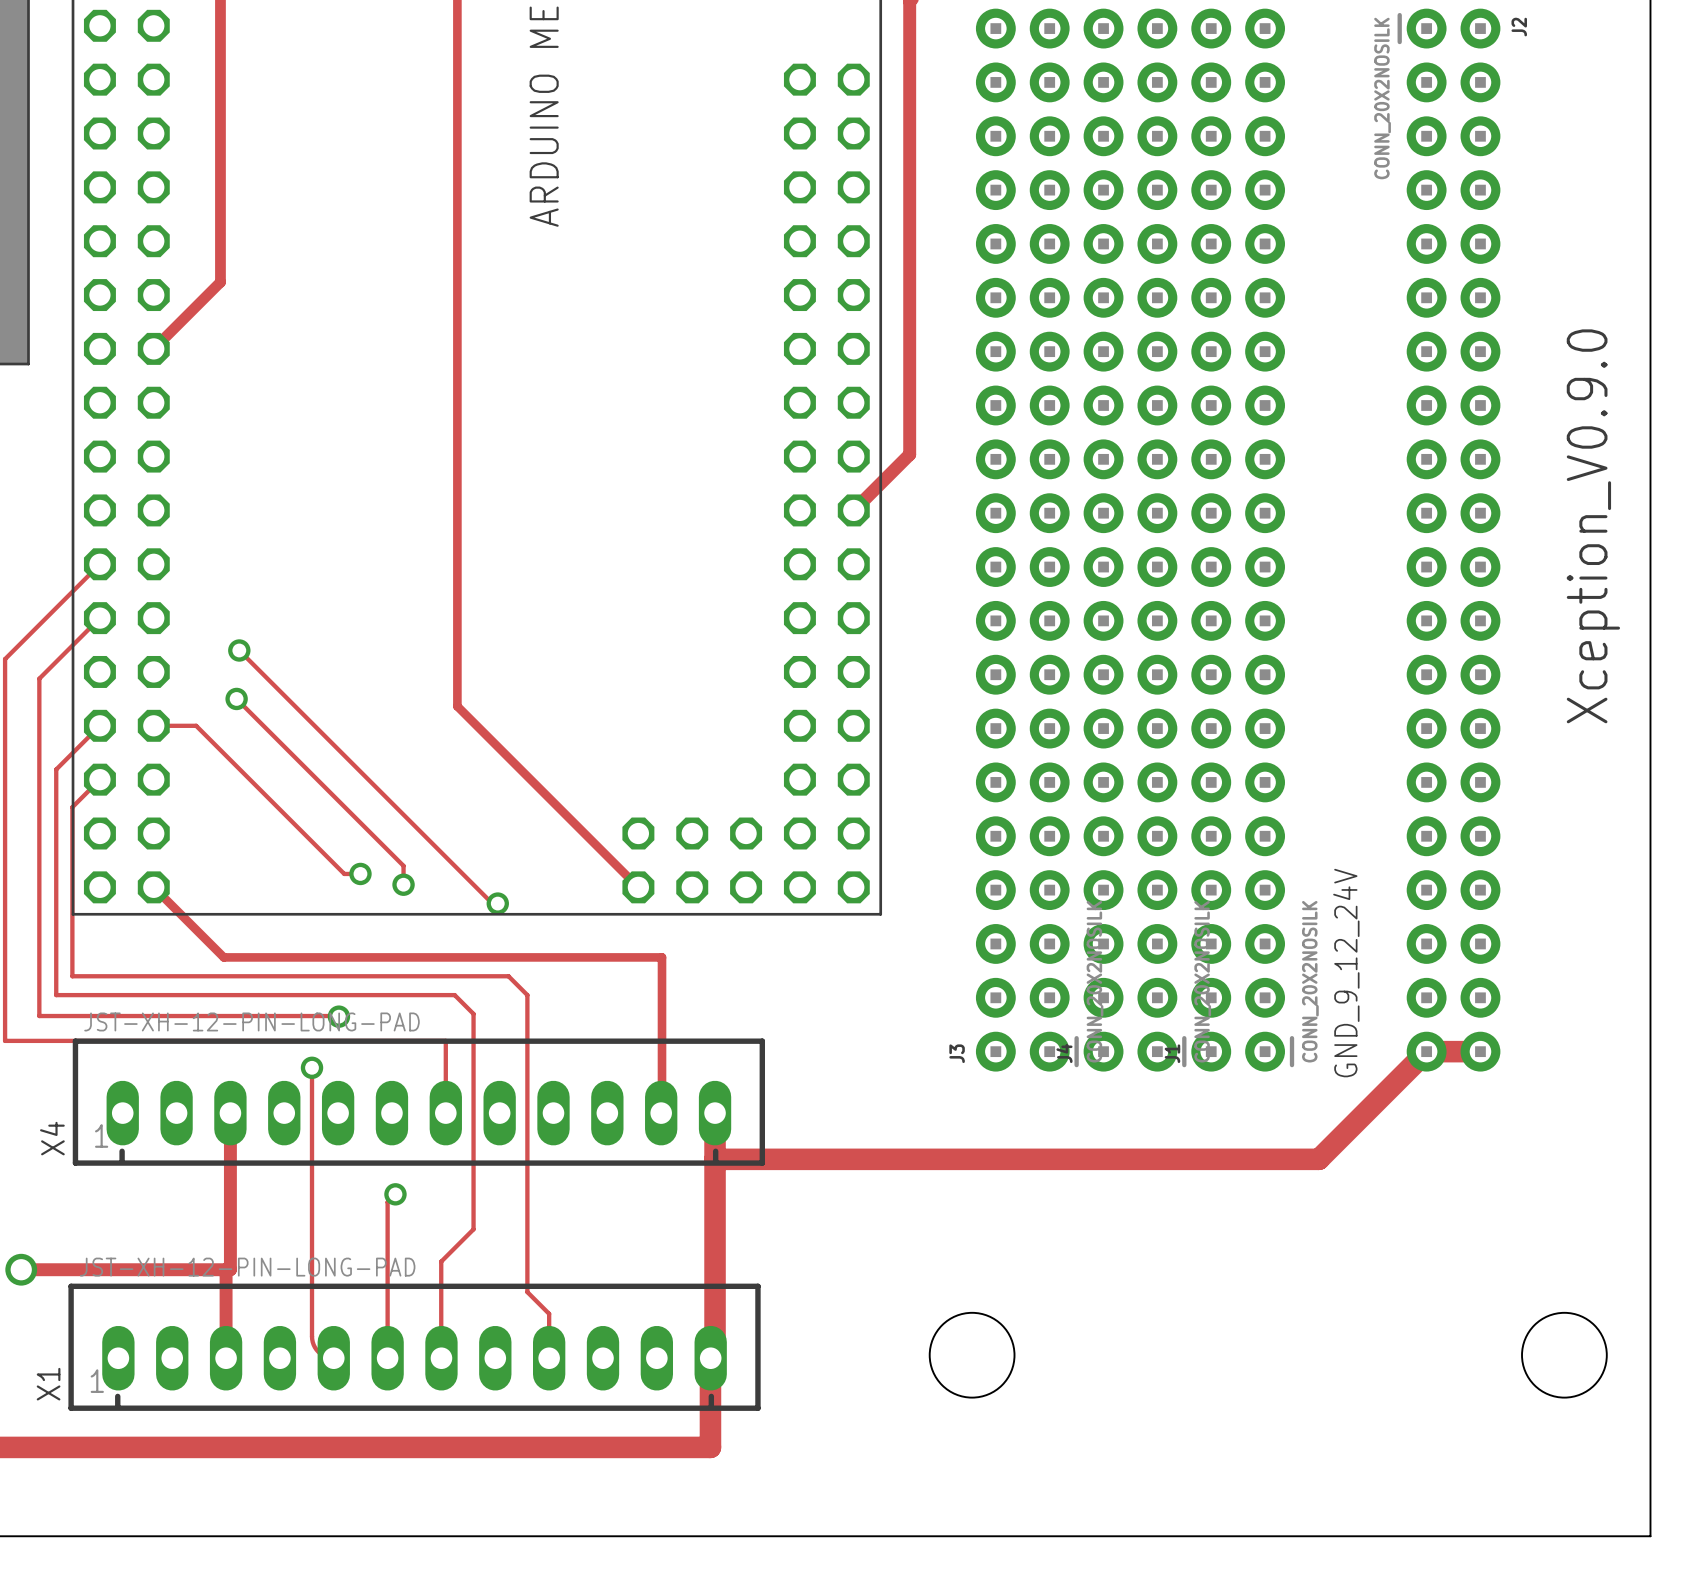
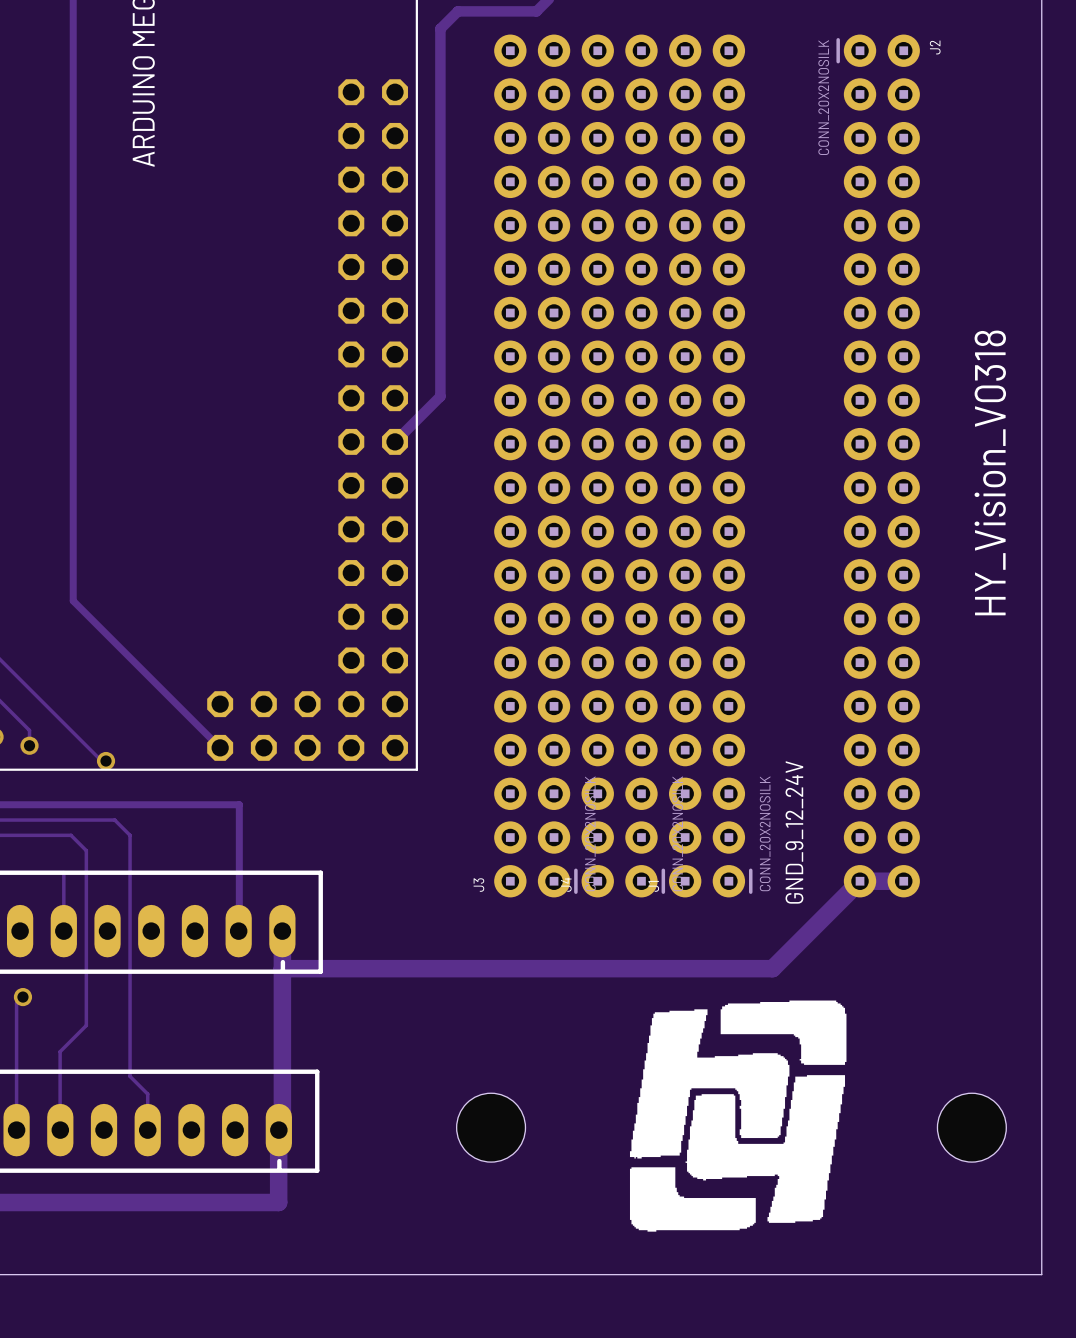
text: Xception_V0.9.0 (1593, 526) -> HY_Vision_V0318 (990, 472)
drawing: none -> [629, 1000, 847, 1232]

